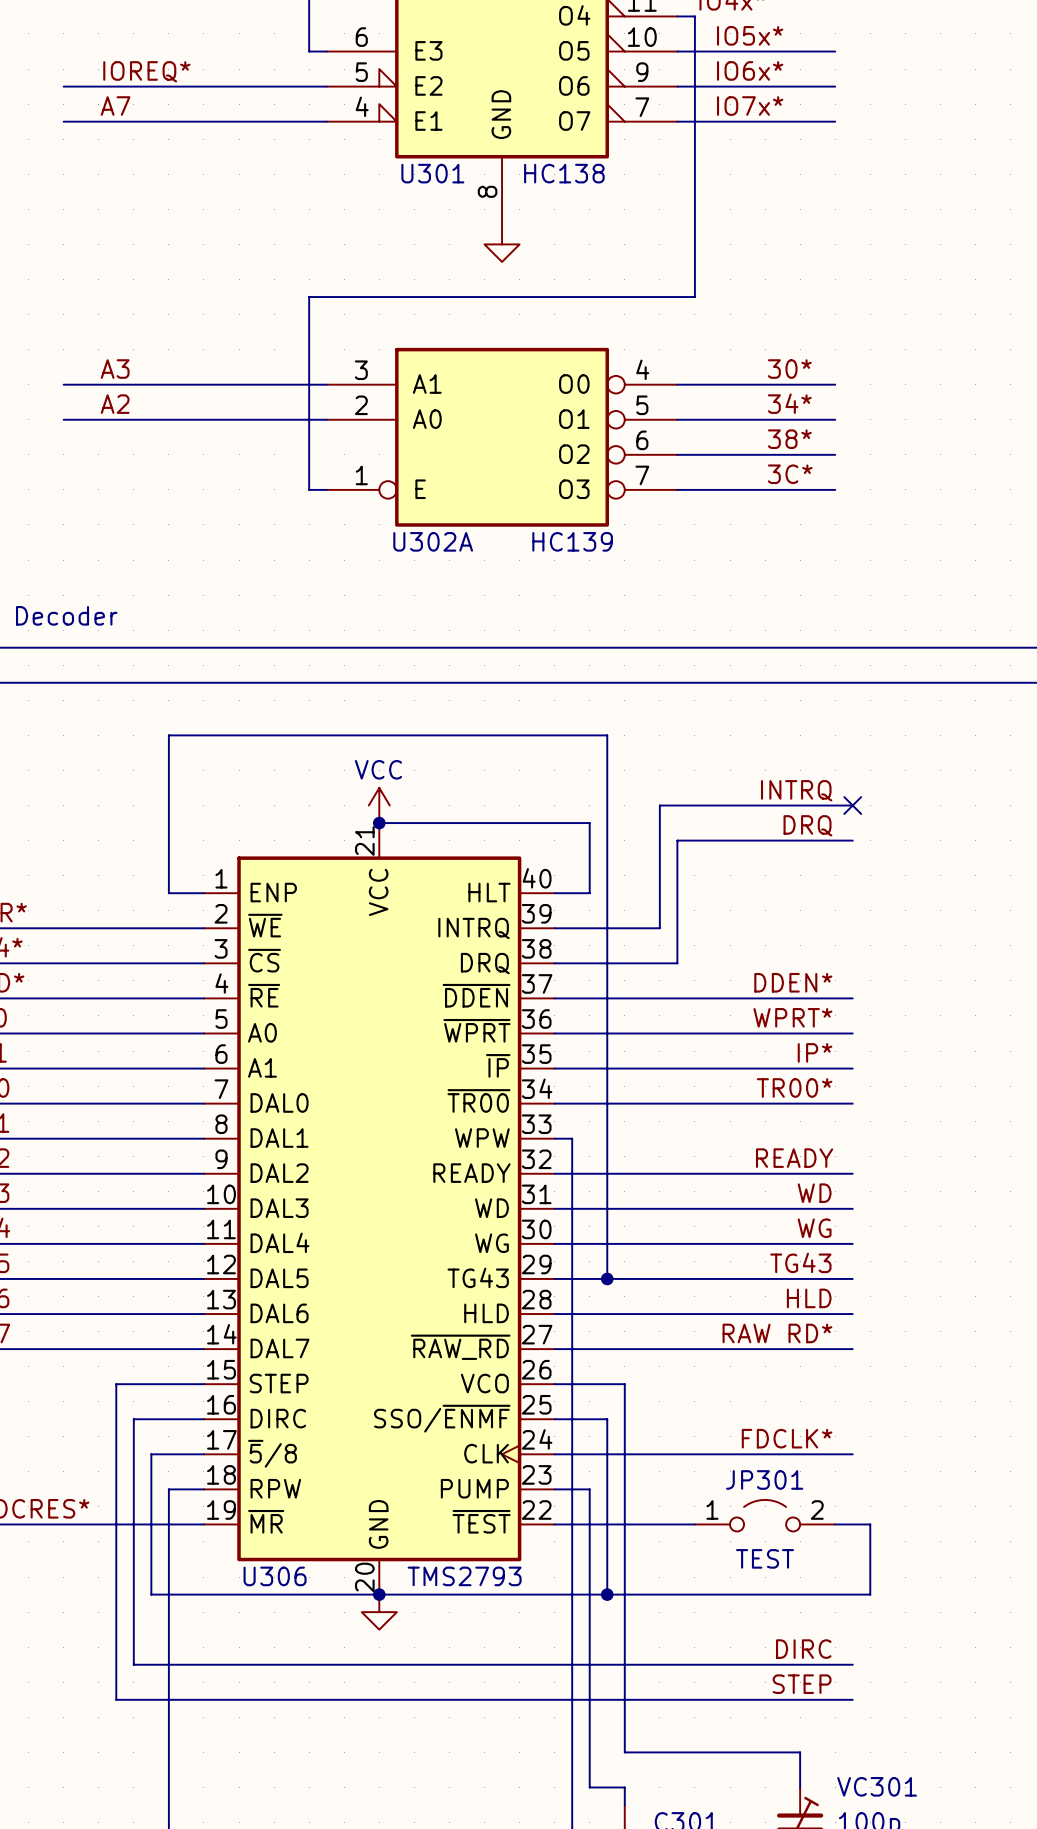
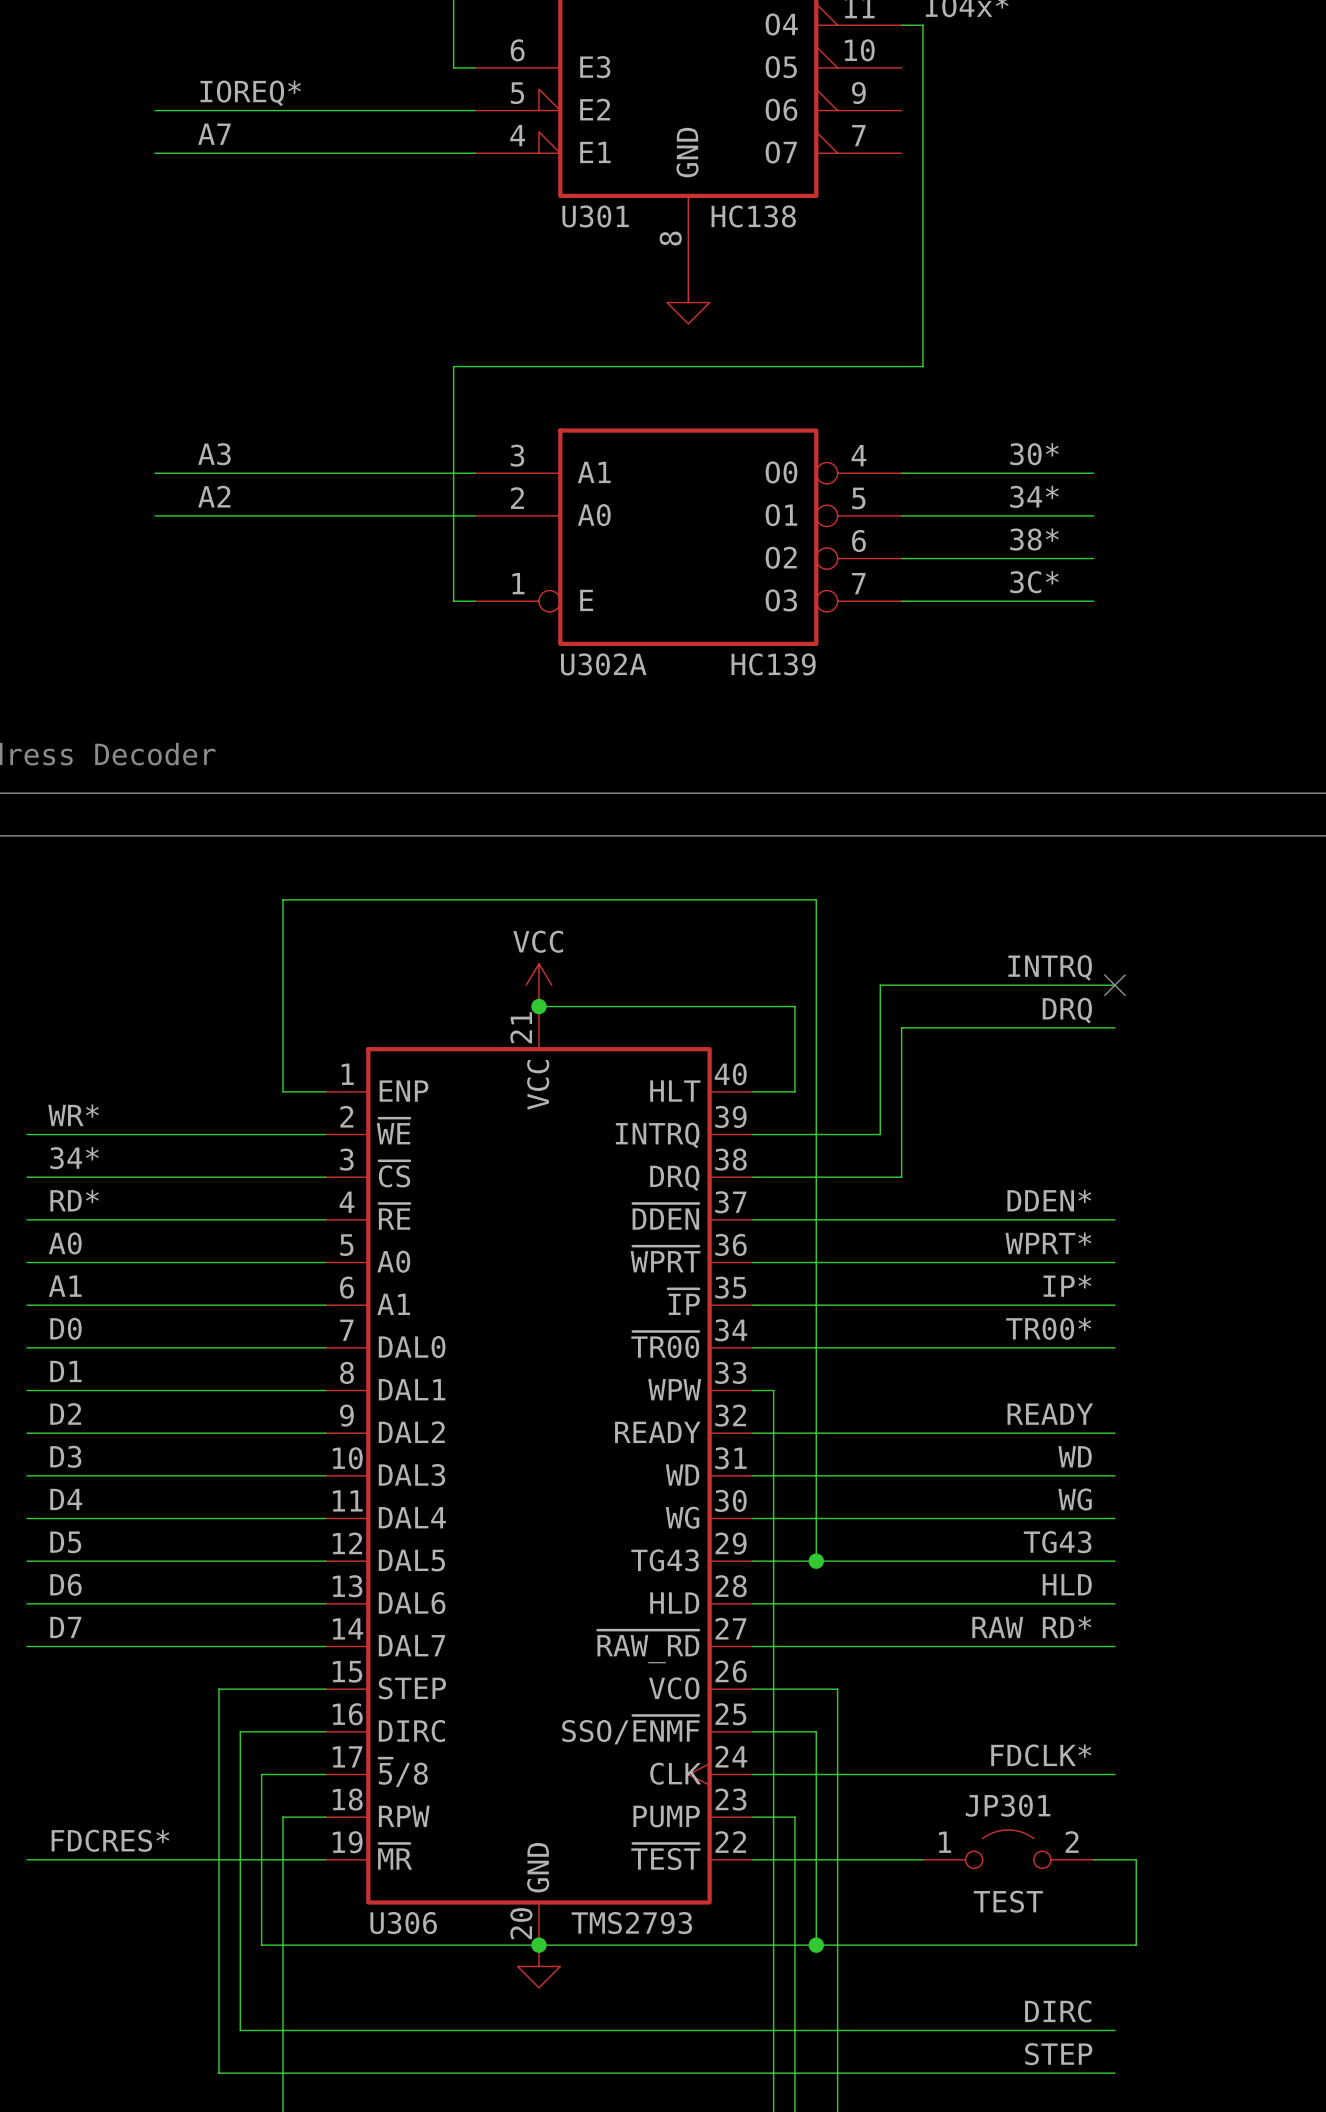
label: IO5x* (750, 35) -> none
wire: (677, 51) (835, 51) -> none
label: IO6x* (750, 70) -> none
wire: (677, 86) (835, 86) -> none
label: IO7x* (750, 106) -> none
wire: (677, 121) (835, 121) -> none

